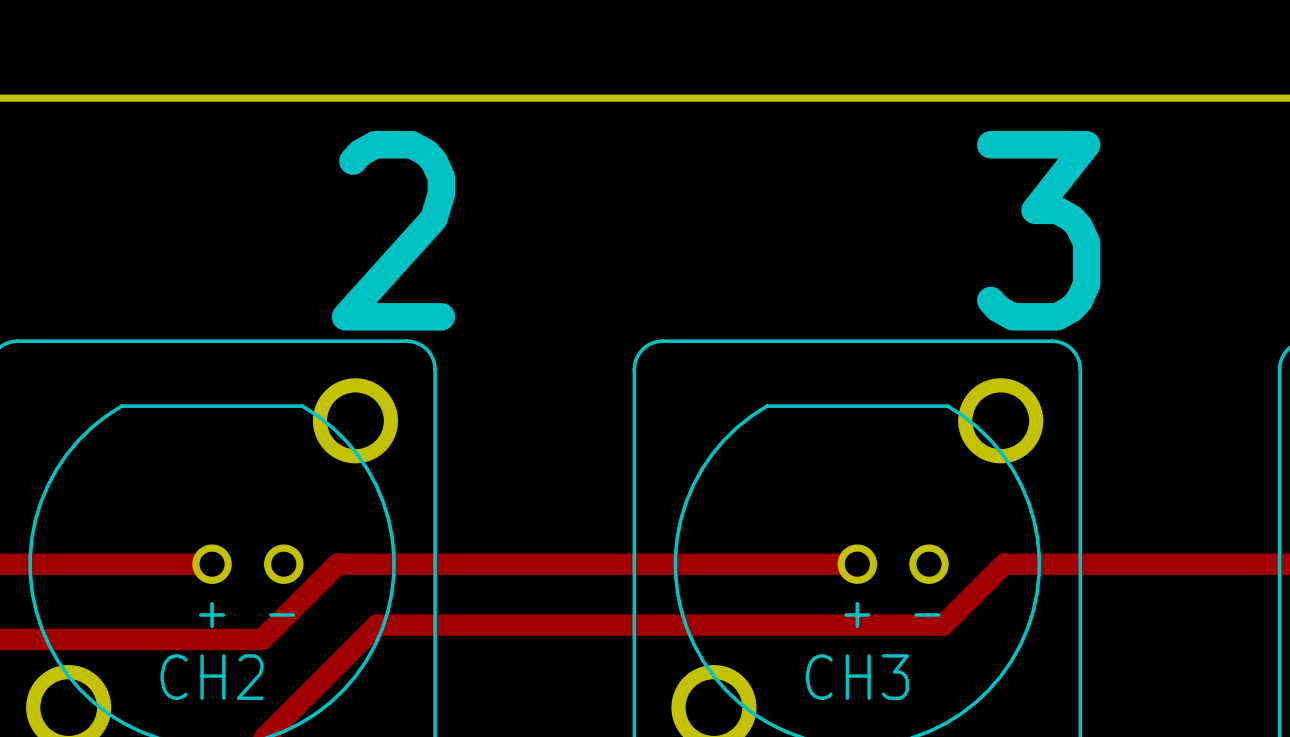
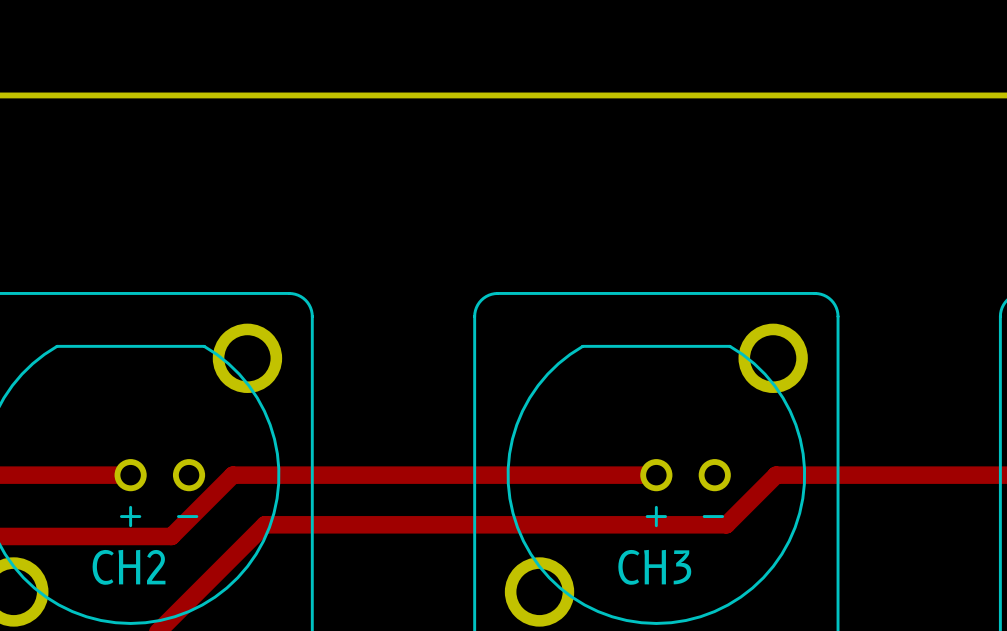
text: 2 (393, 230) -> none
text: 3 (1038, 230) -> none

